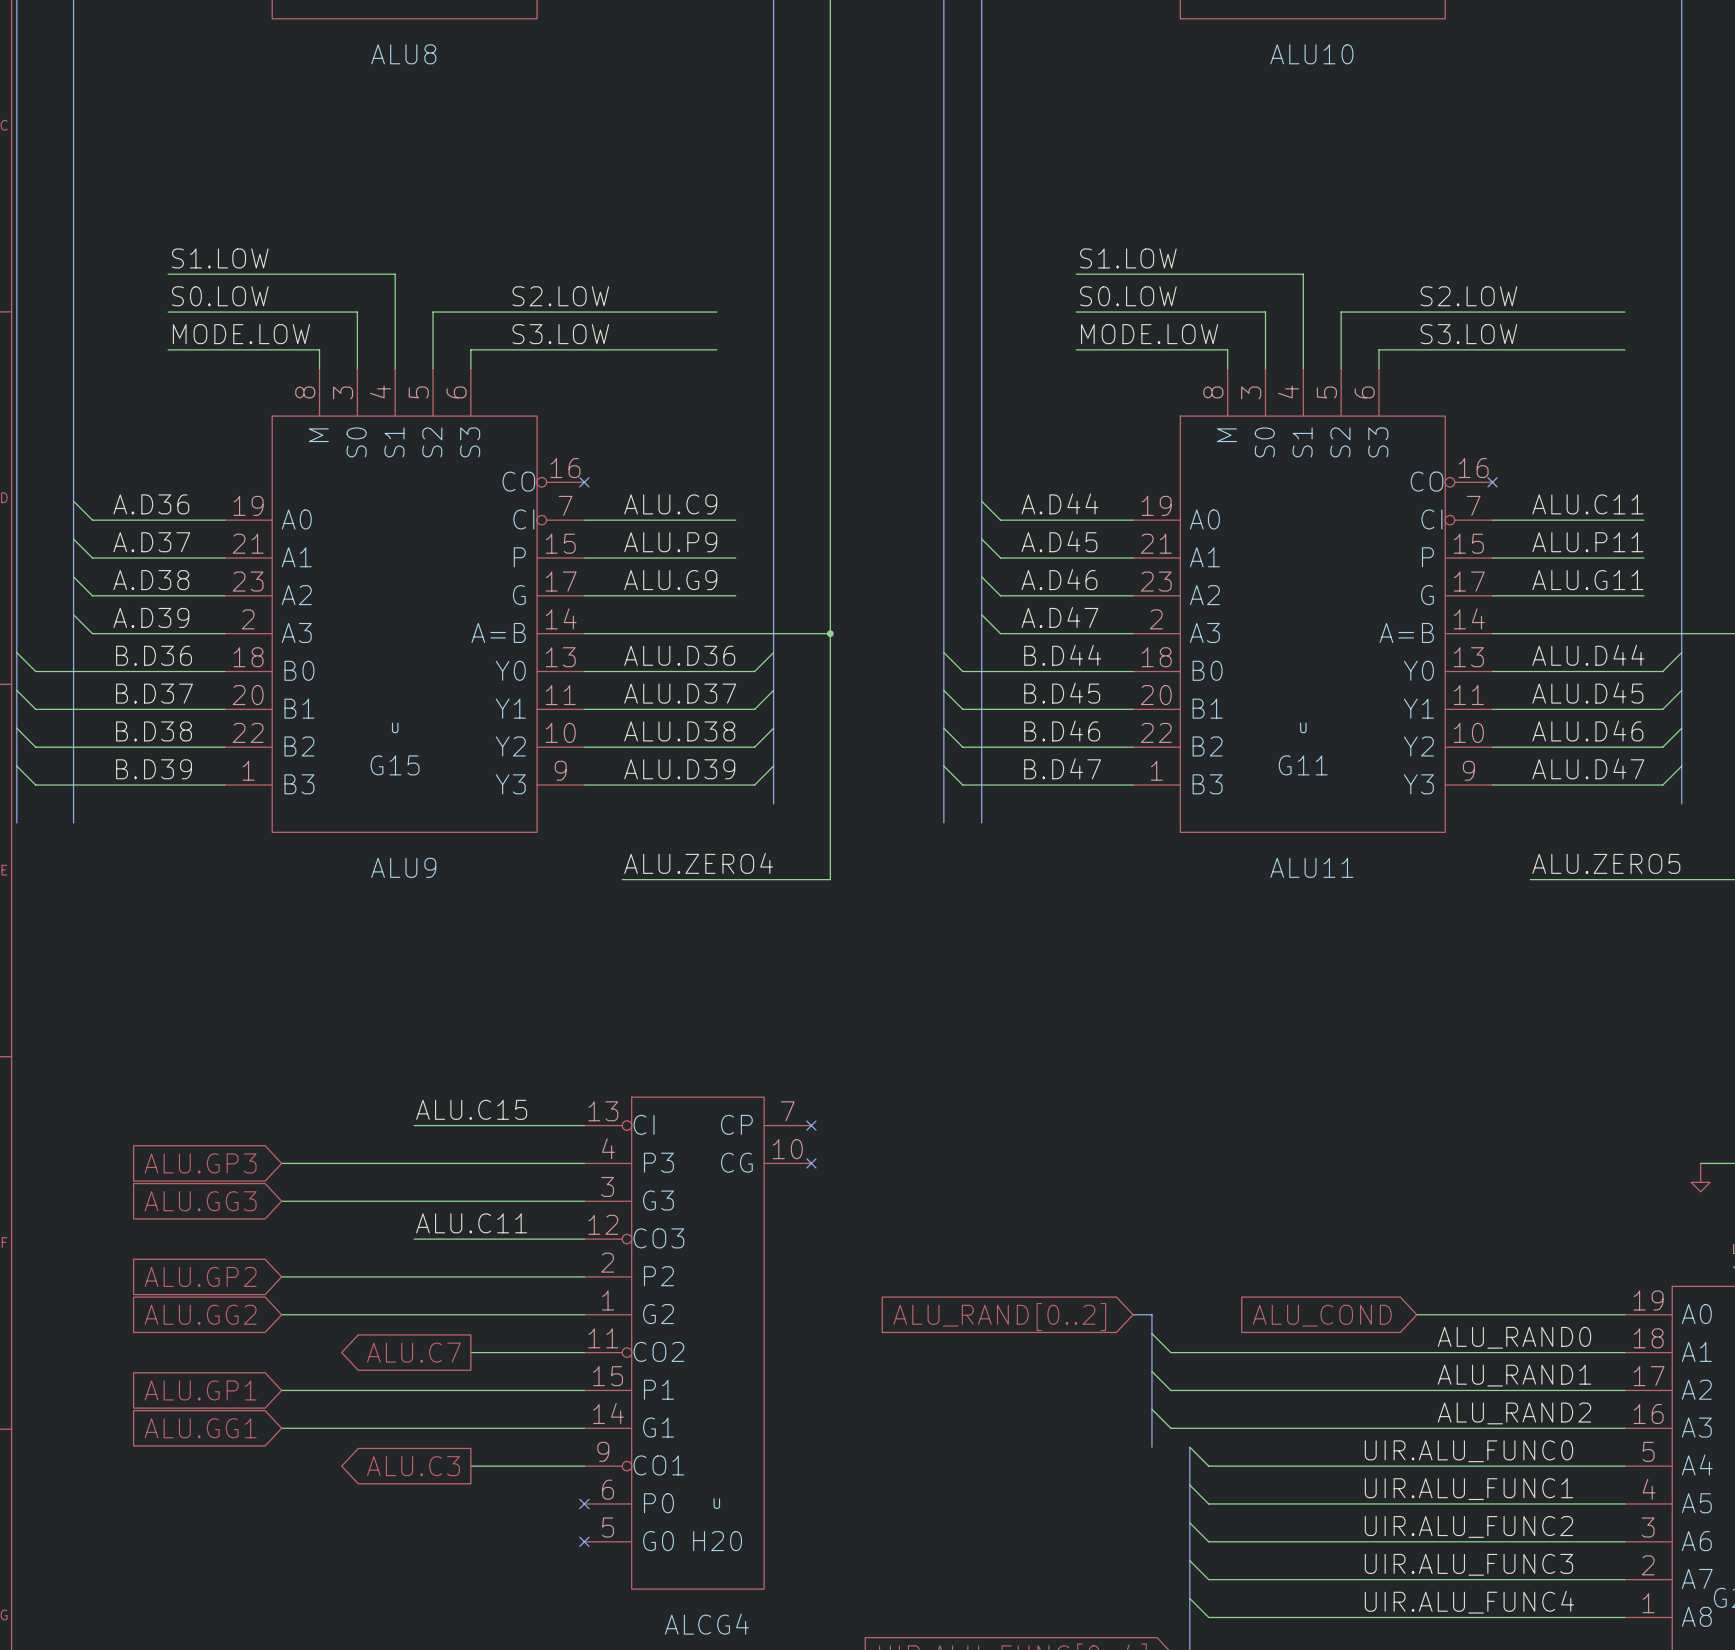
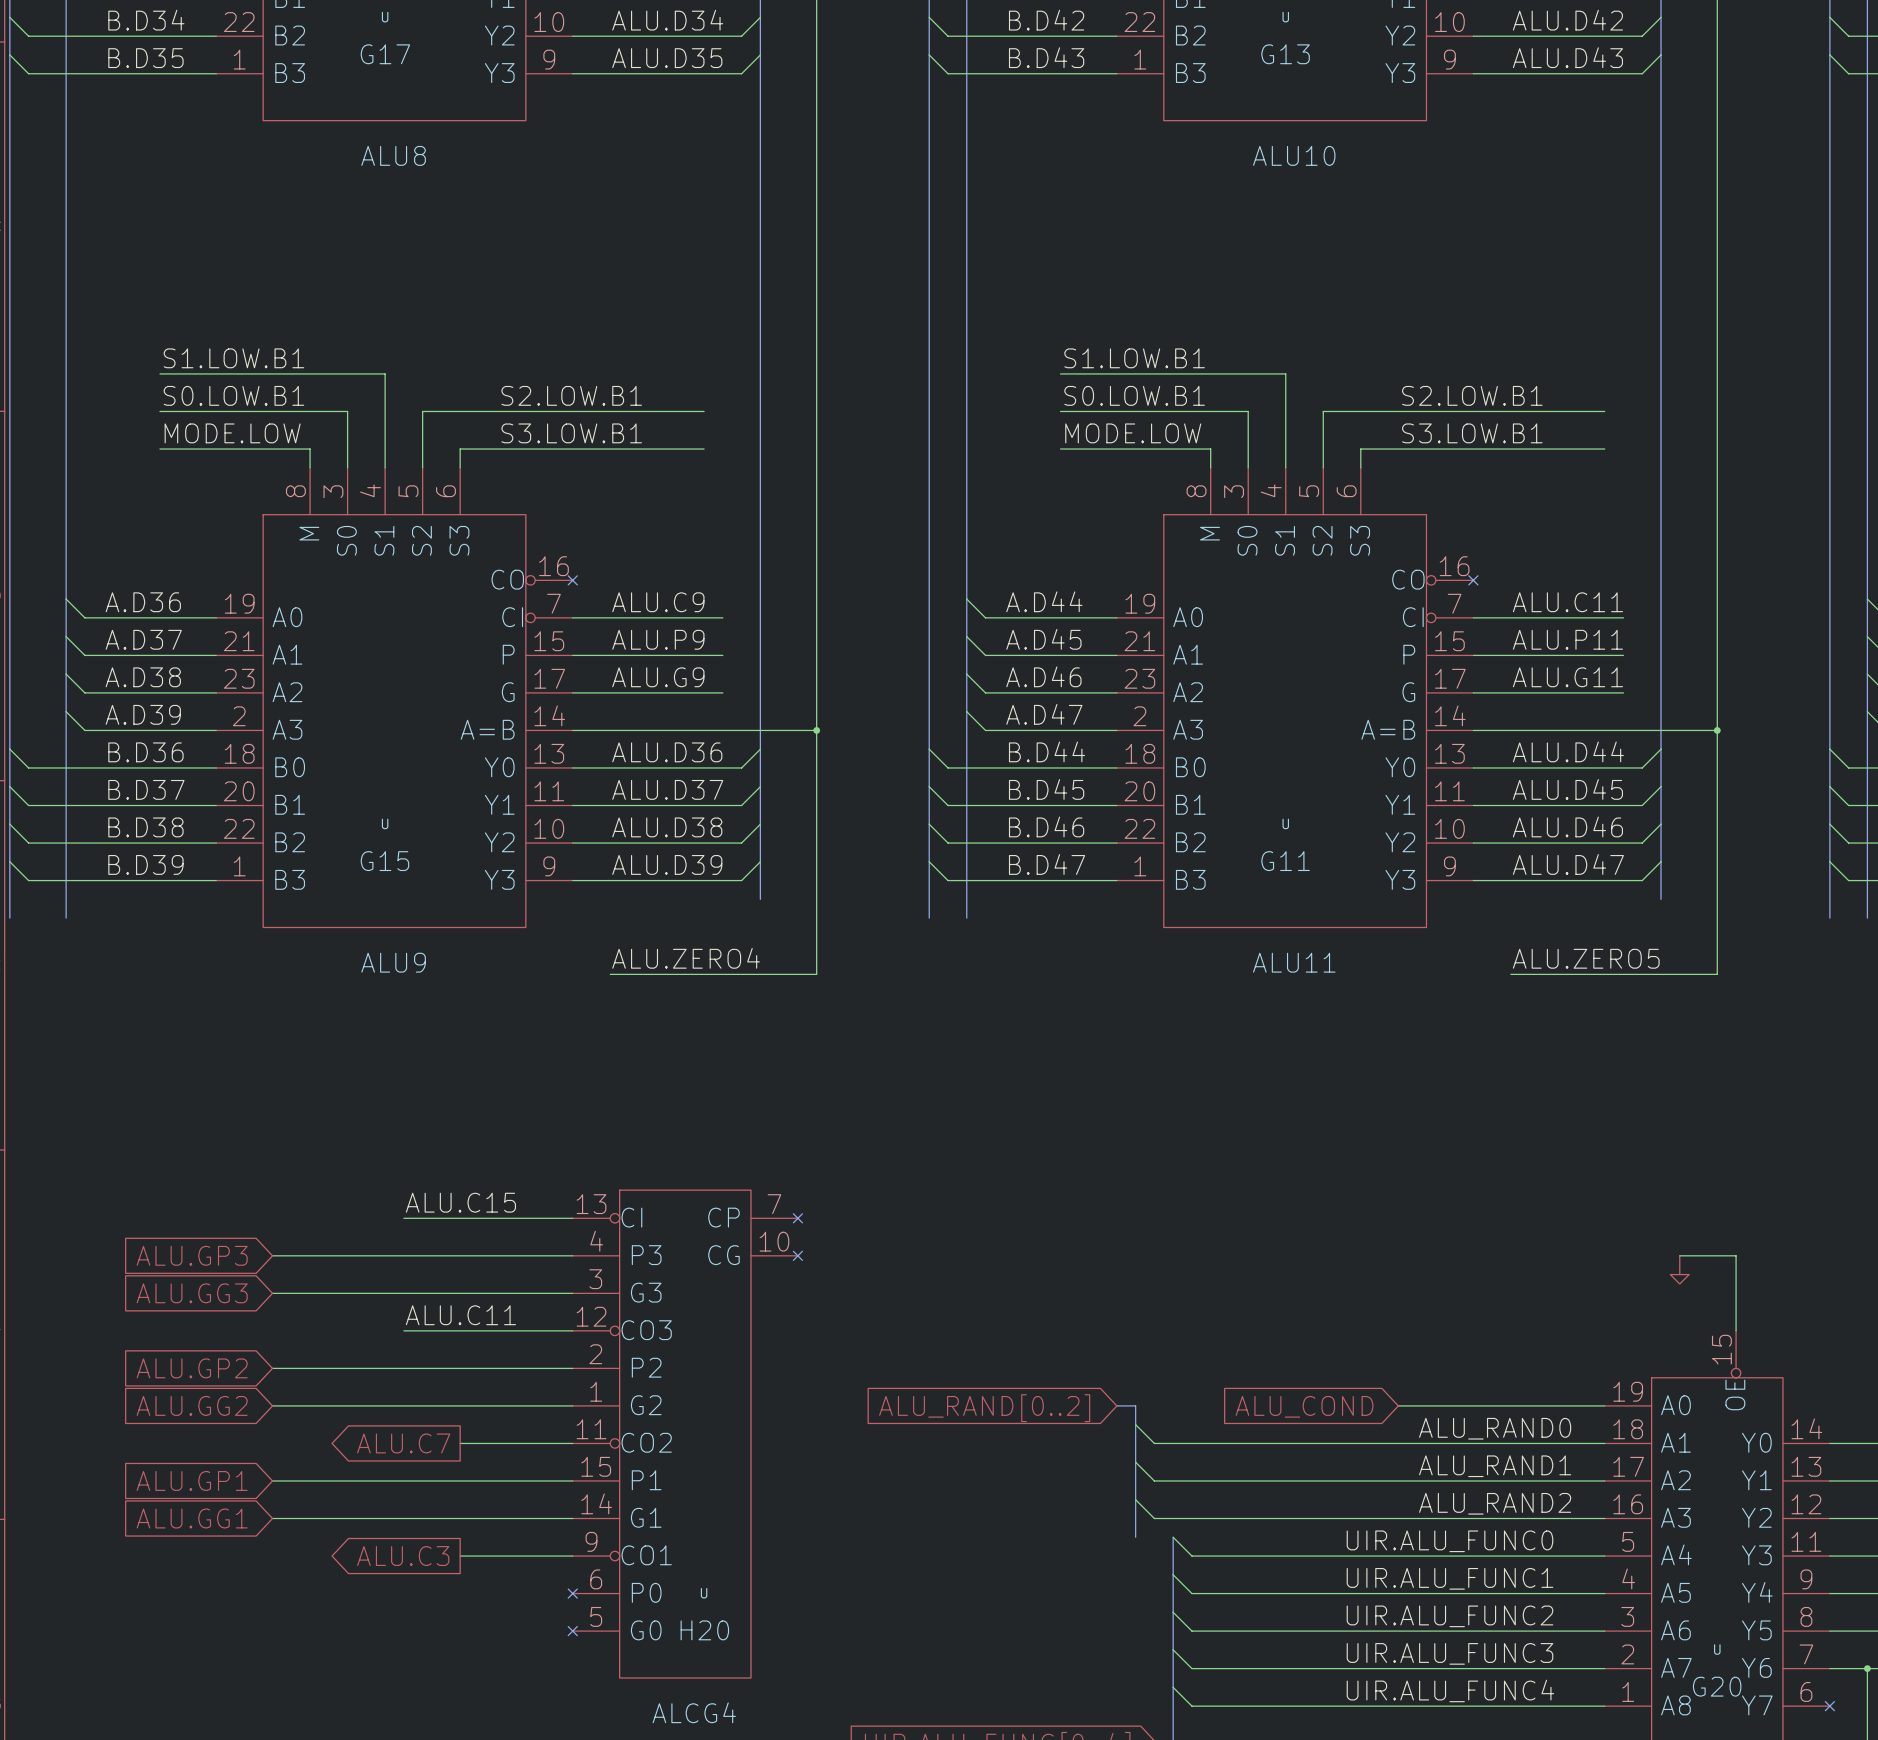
label: S1.LOW (220, 258) -> S1.LOW.B1 (233, 358)
label: S1.LOW (1128, 258) -> S1.LOW.B1 (1134, 358)
label: S0.LOW (220, 296) -> S0.LOW.B1 (233, 395)
label: S2.LOW (560, 296) -> S2.LOW.B1 (571, 395)
label: S0.LOW (1128, 296) -> S0.LOW.B1 (1134, 395)
label: S2.LOW (1468, 296) -> S2.LOW.B1 (1472, 395)
label: S3.LOW (560, 334) -> S3.LOW.B1 (571, 433)
label: S3.LOW (1468, 334) -> S3.LOW.B1 (1472, 433)

